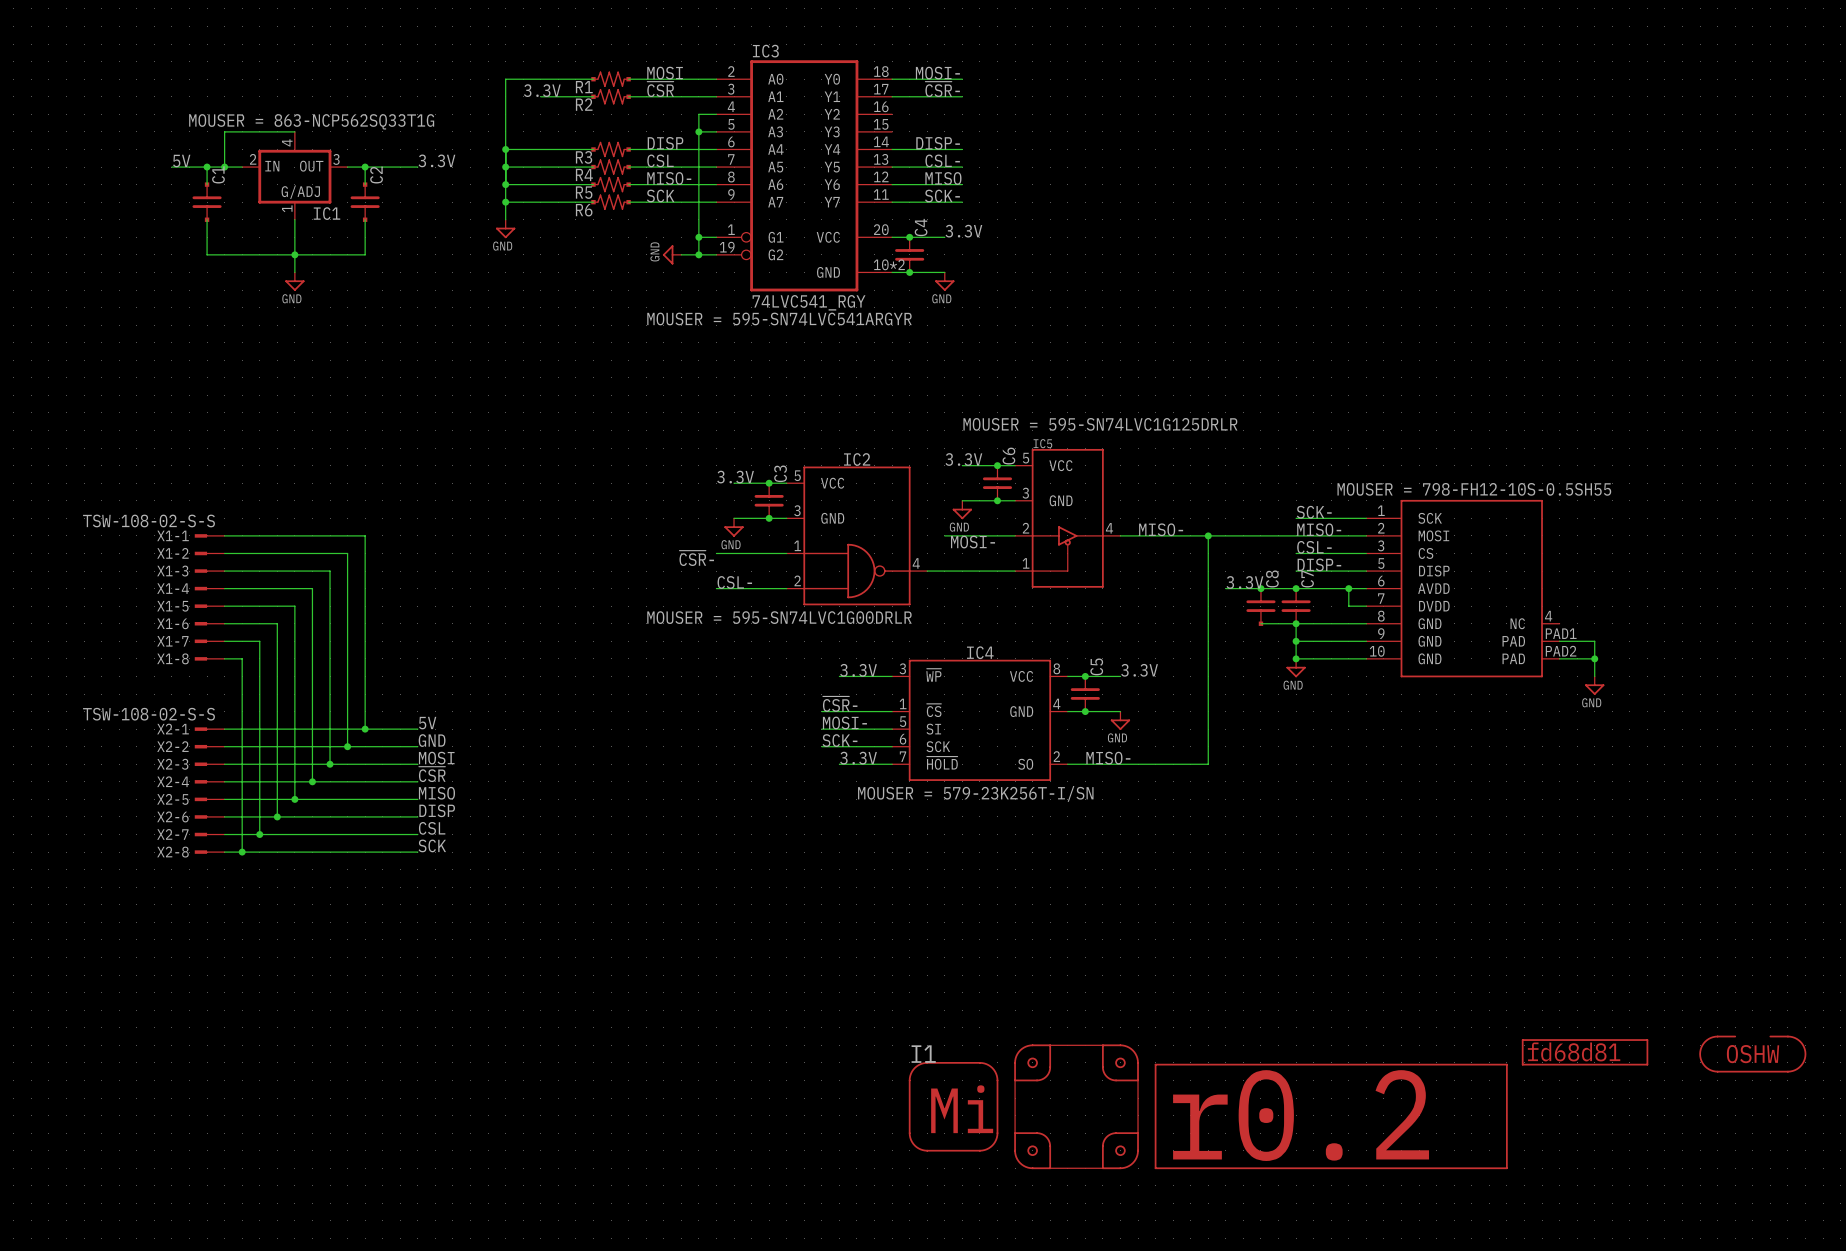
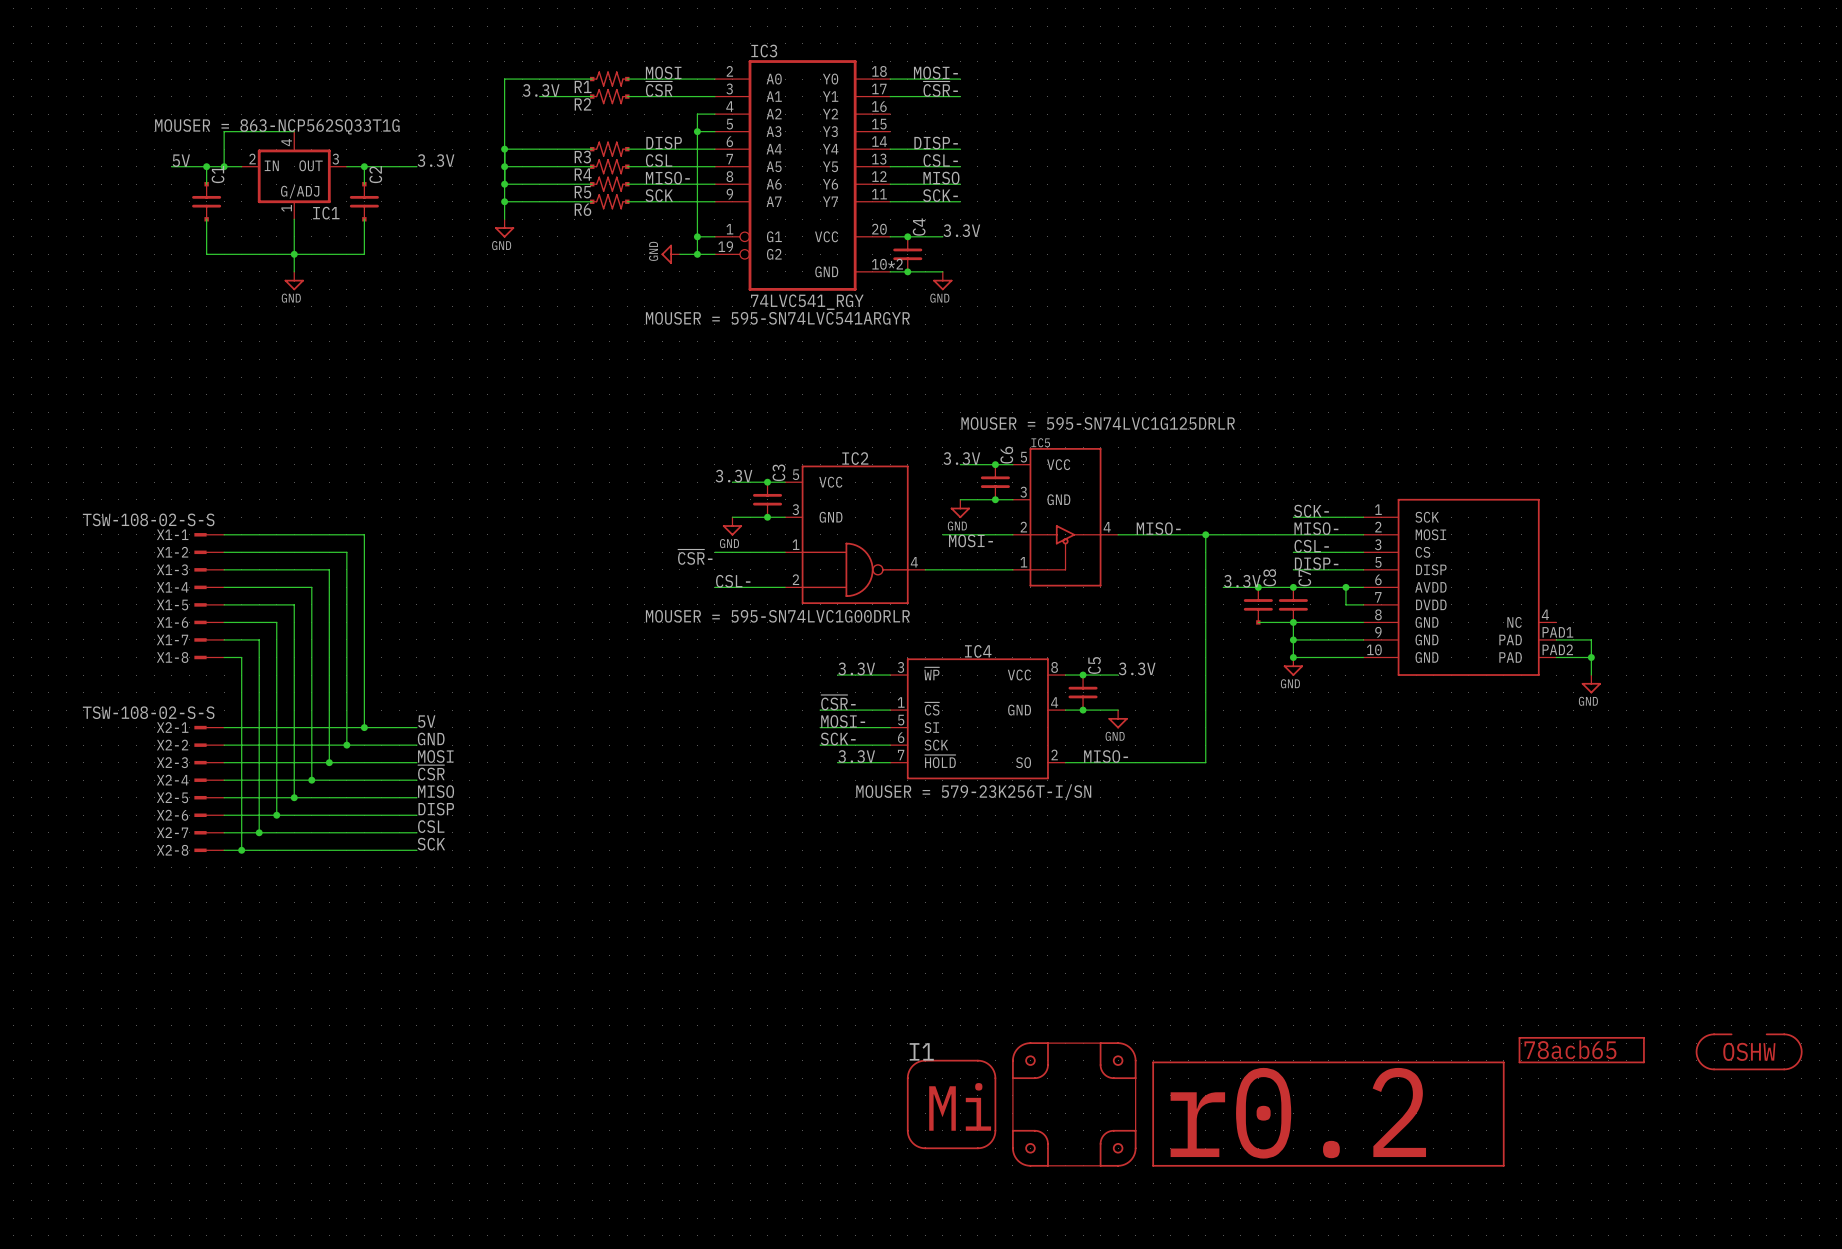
IC1 text position: MOUSER = 863-NCP562SQ33T1G (311, 121) -> MOUSER = 863-NCP562SQ33T1G (277, 126)
part text: MOUSER = 798-FH12-10S-0.5SH55 (1474, 489) -> none
part value: fd68d81 (1574, 1051) -> 78acb65 (1570, 1049)

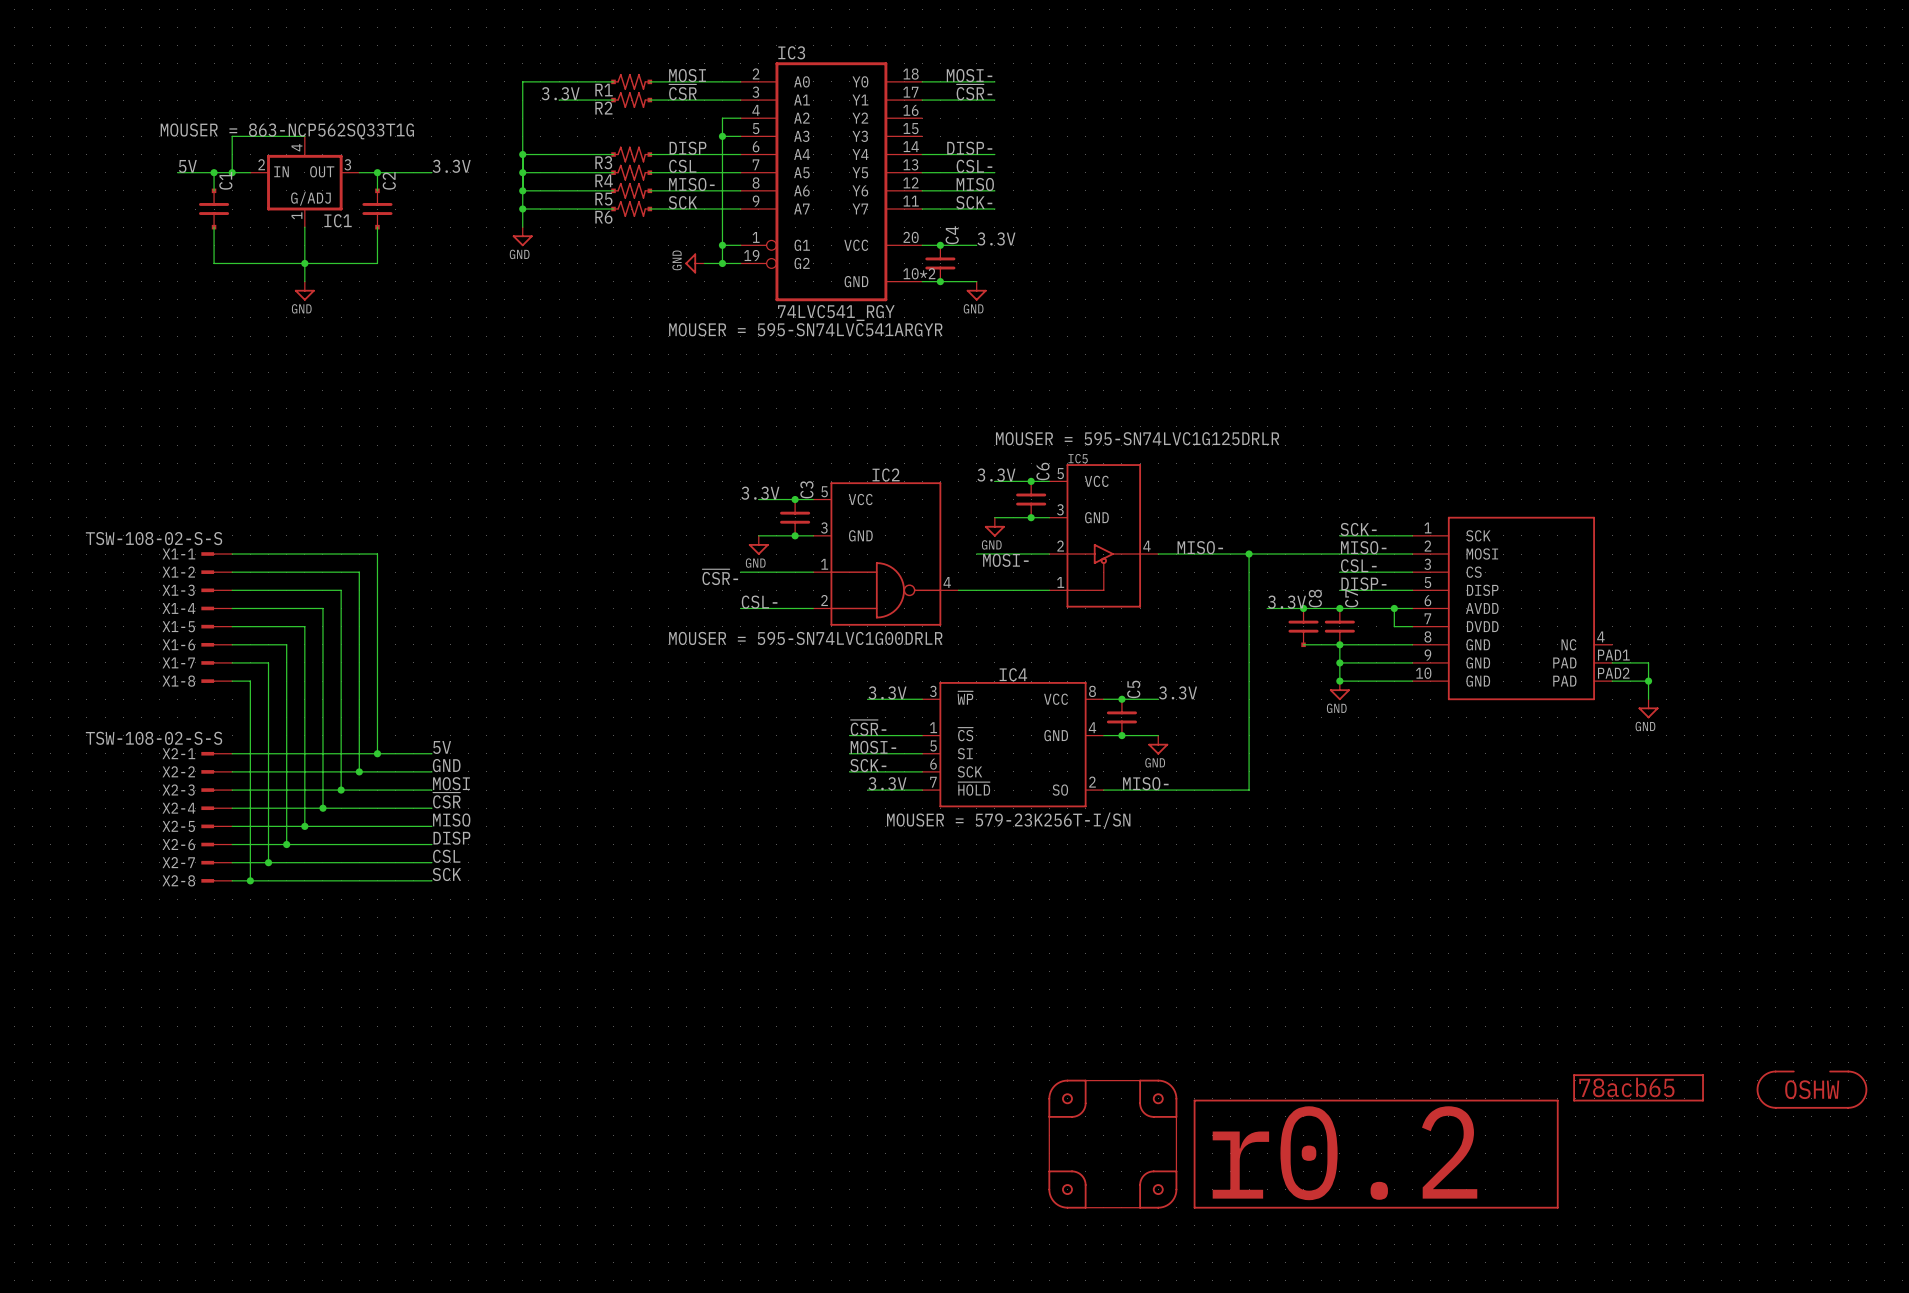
I1: (951, 1104) -> none

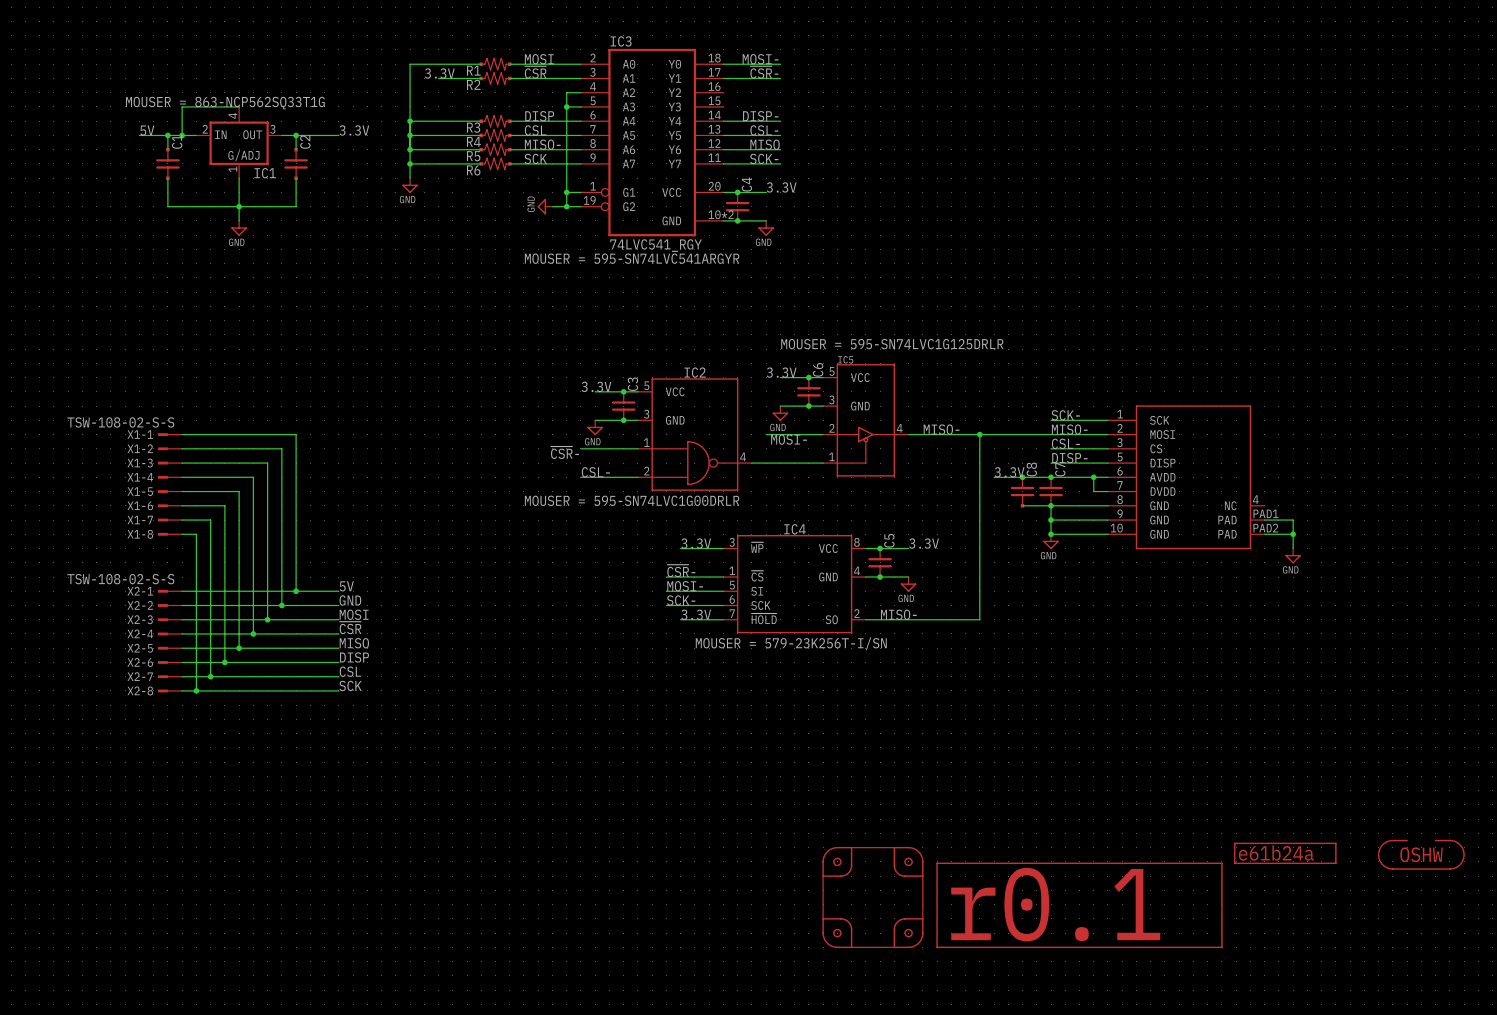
part value: 78acb65 (1626, 1087) -> e61b24a (1276, 853)
part value: r0.2 (1344, 1153) -> r0.1 (1055, 904)

